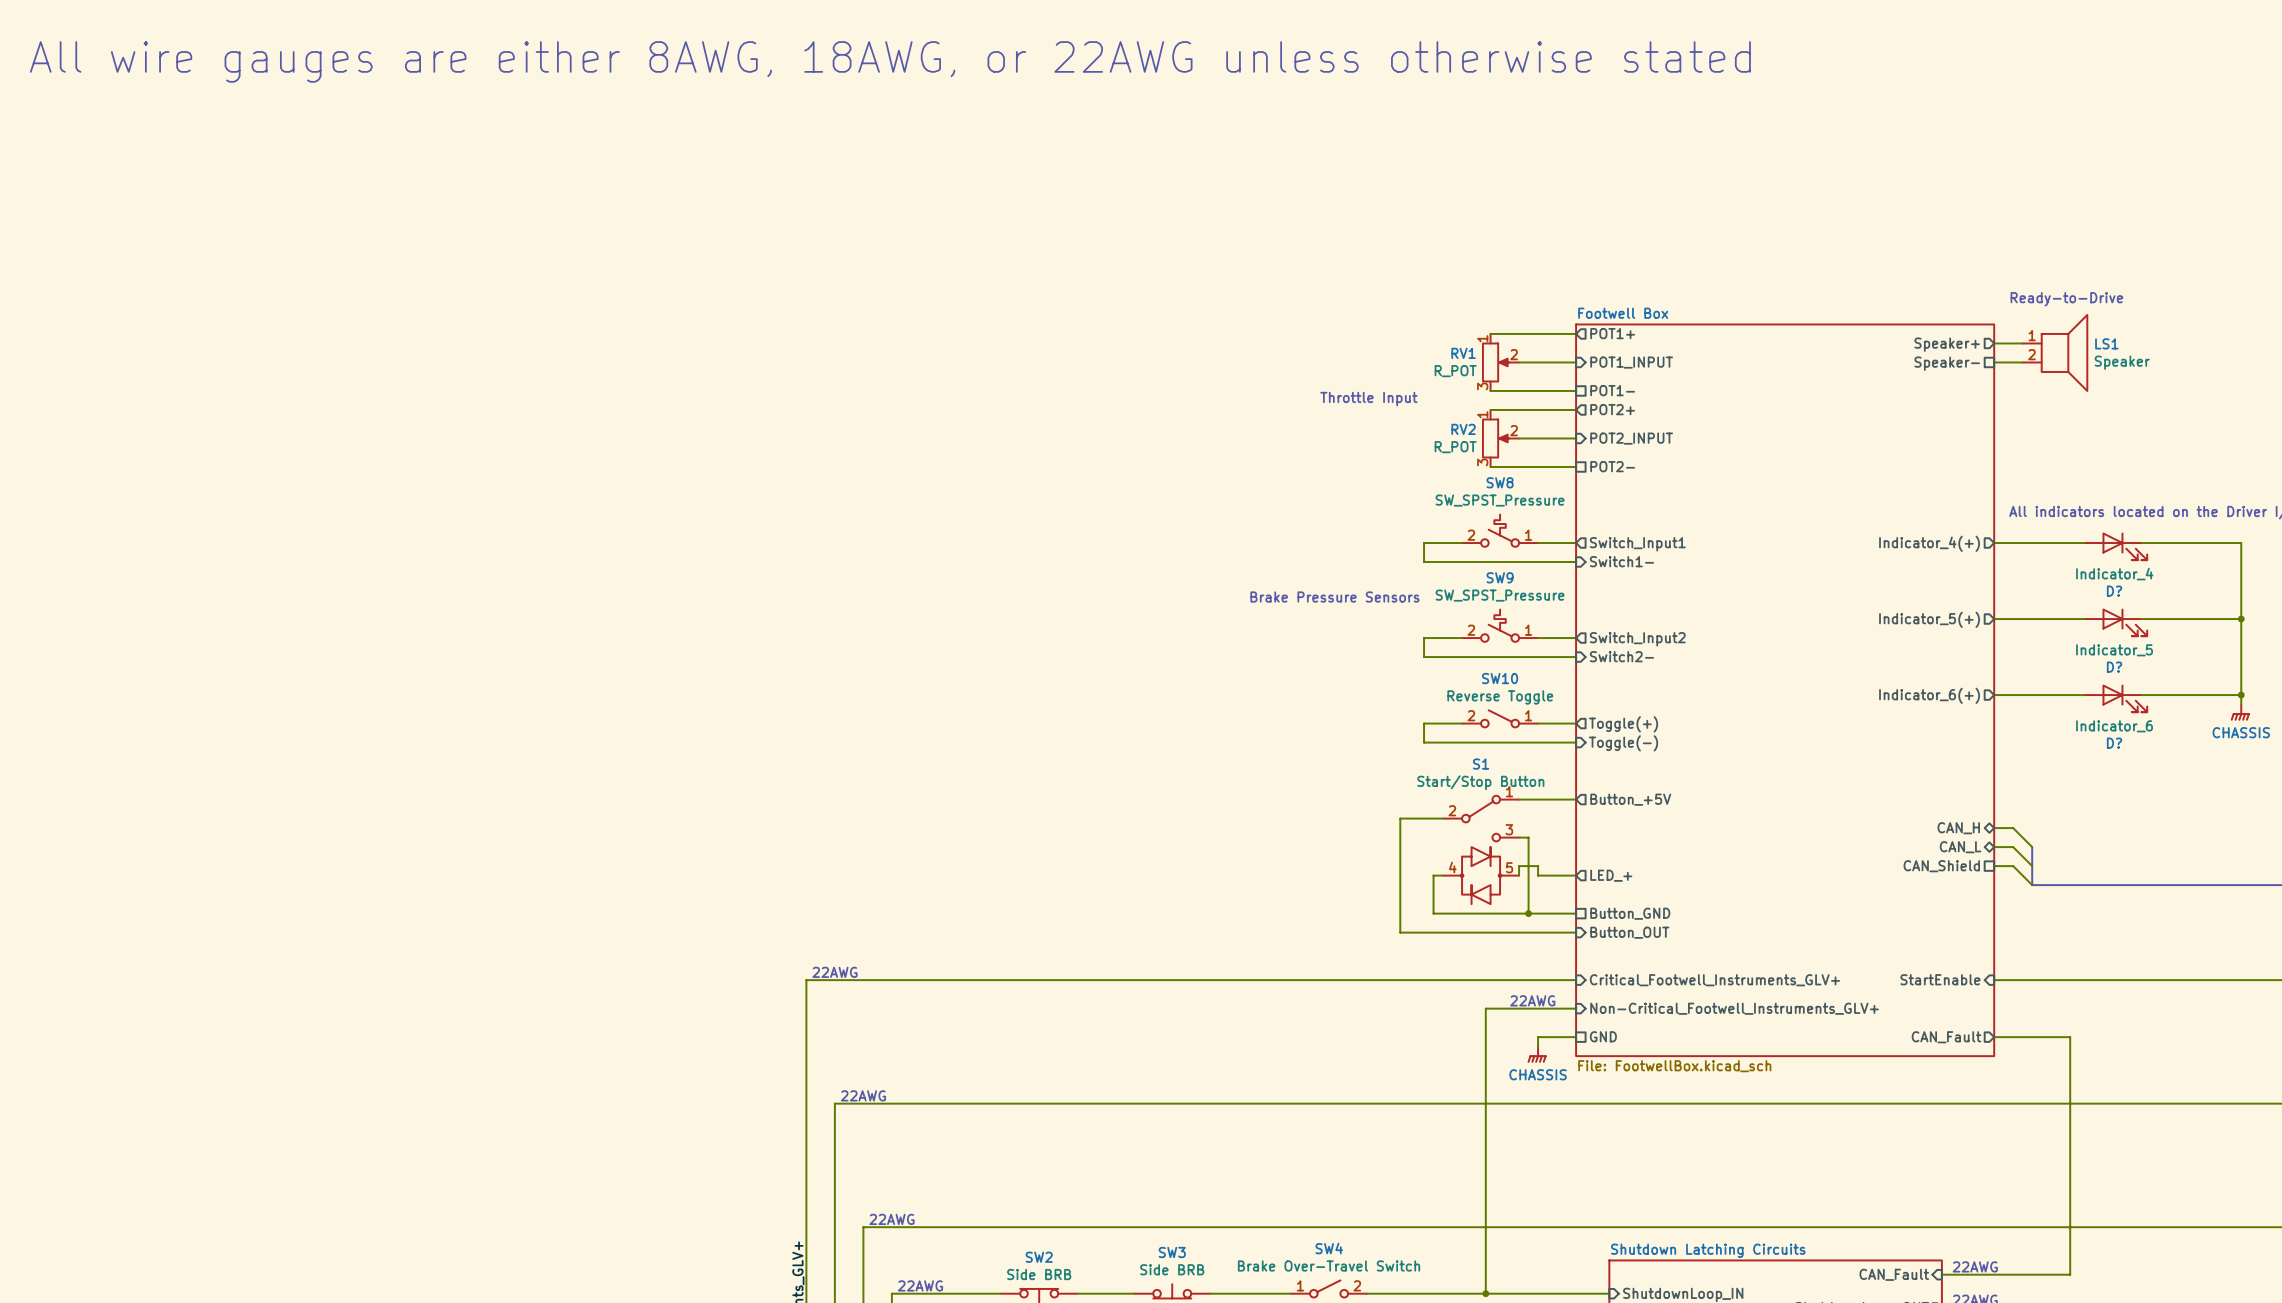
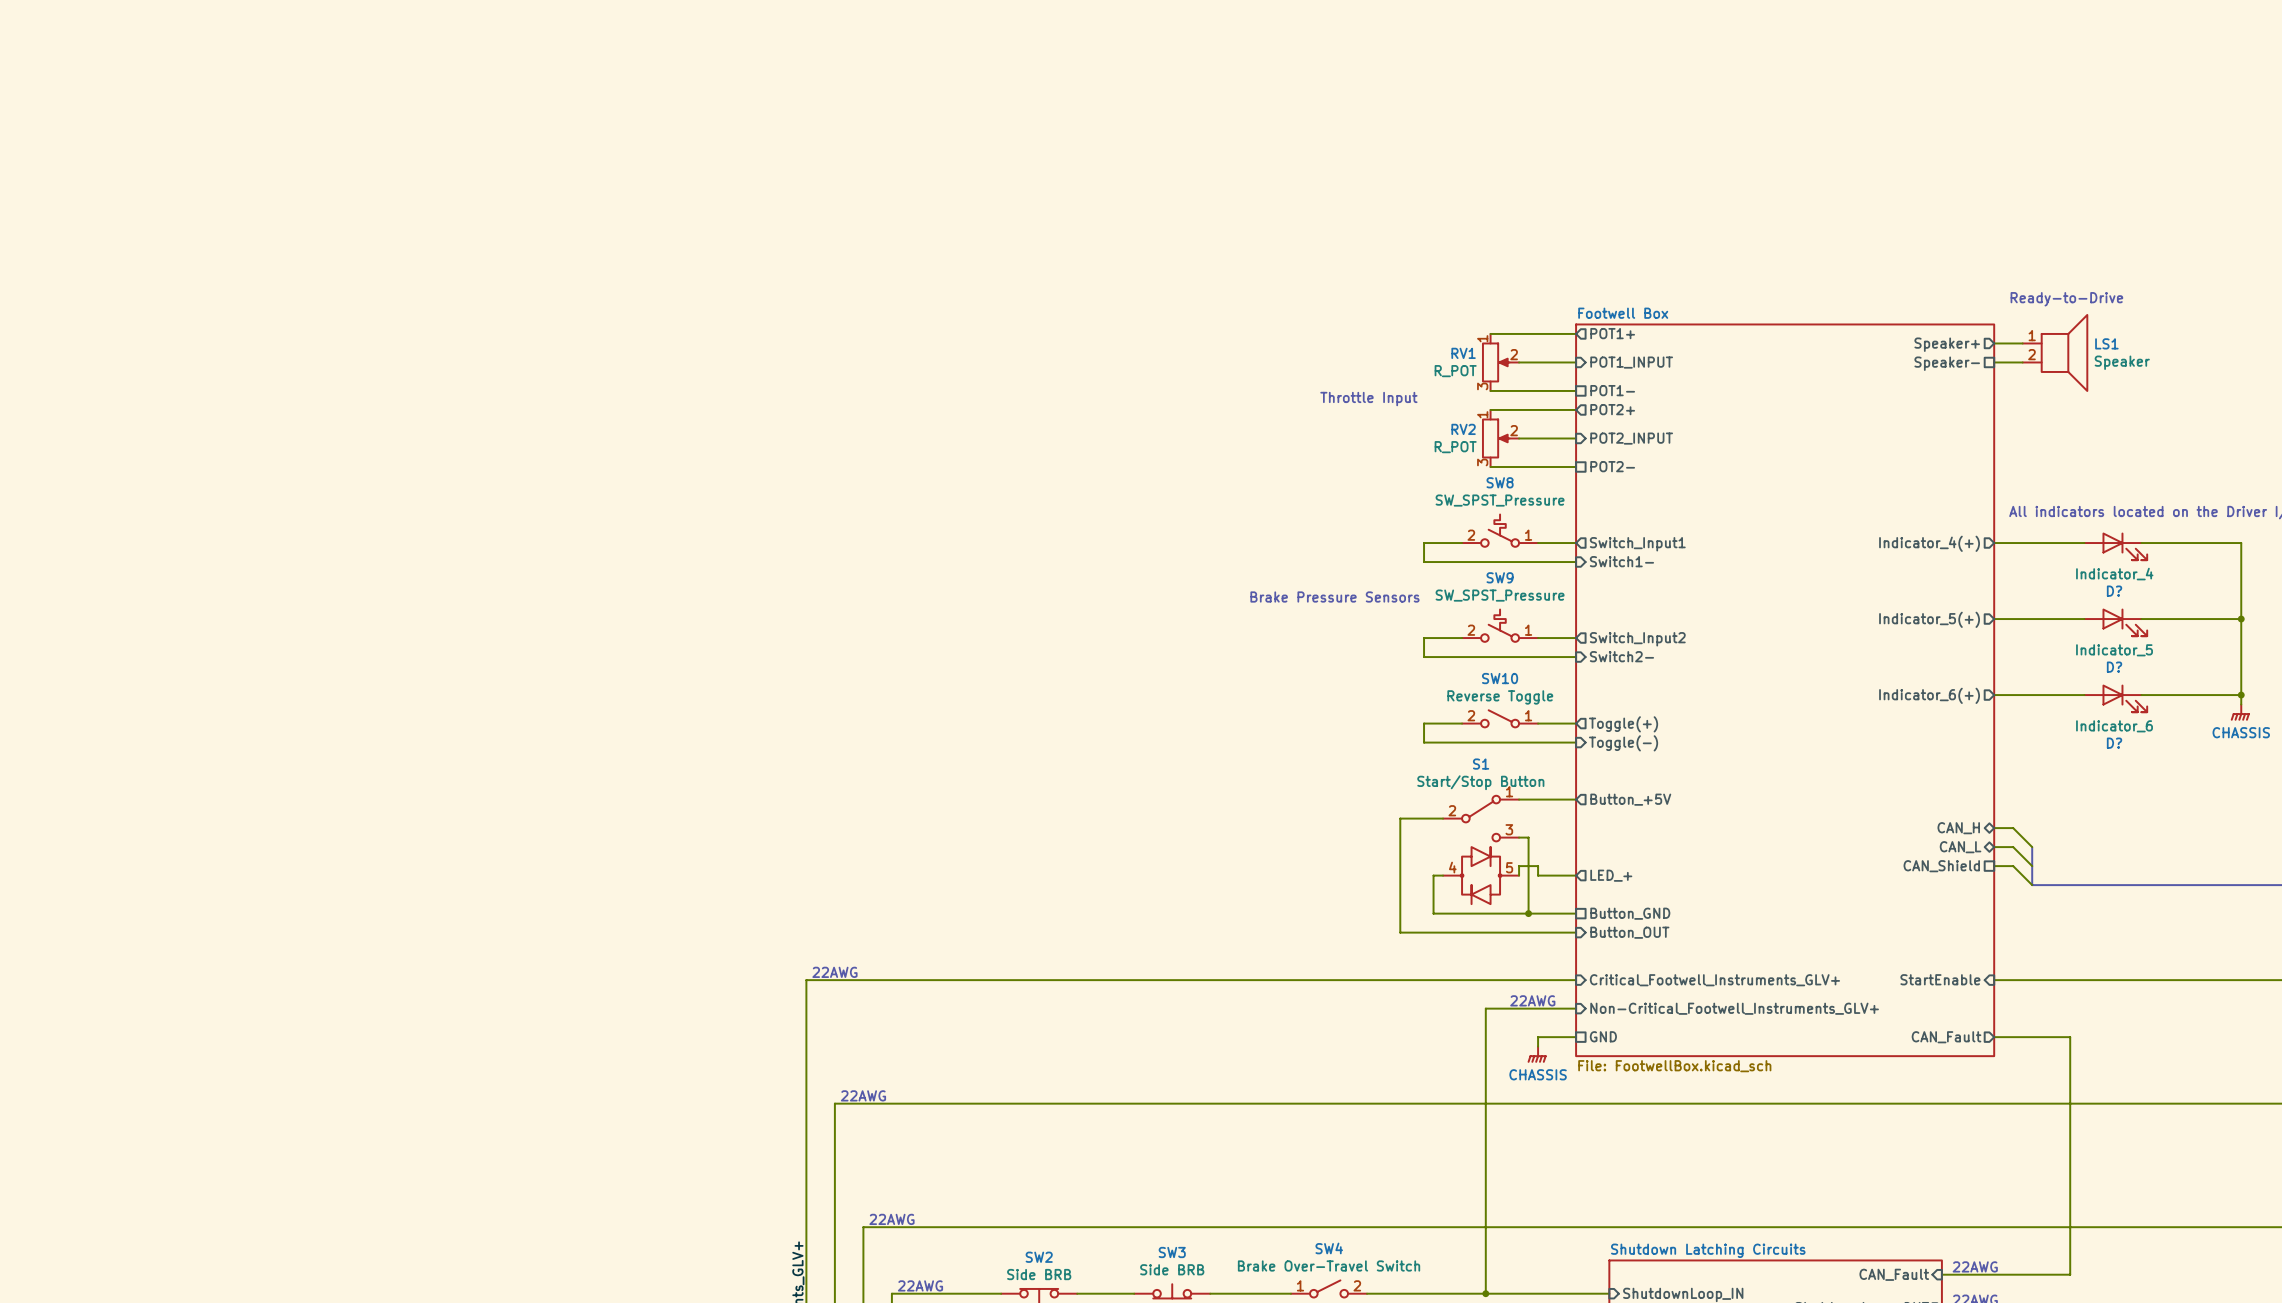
text: All wire gauges are either 8AWG, 18AWG, or 22AWG unless otherwise stated (890, 61) -> none

